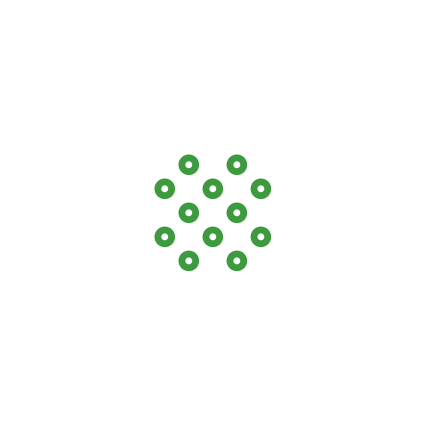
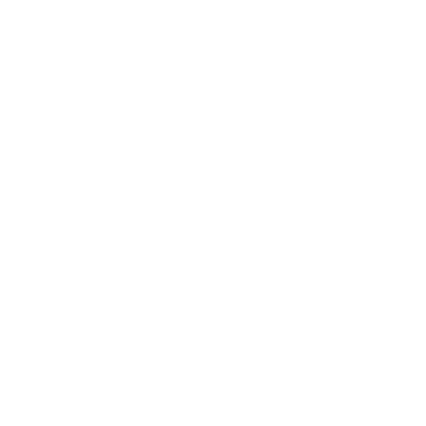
part: (212, 212) -> none

